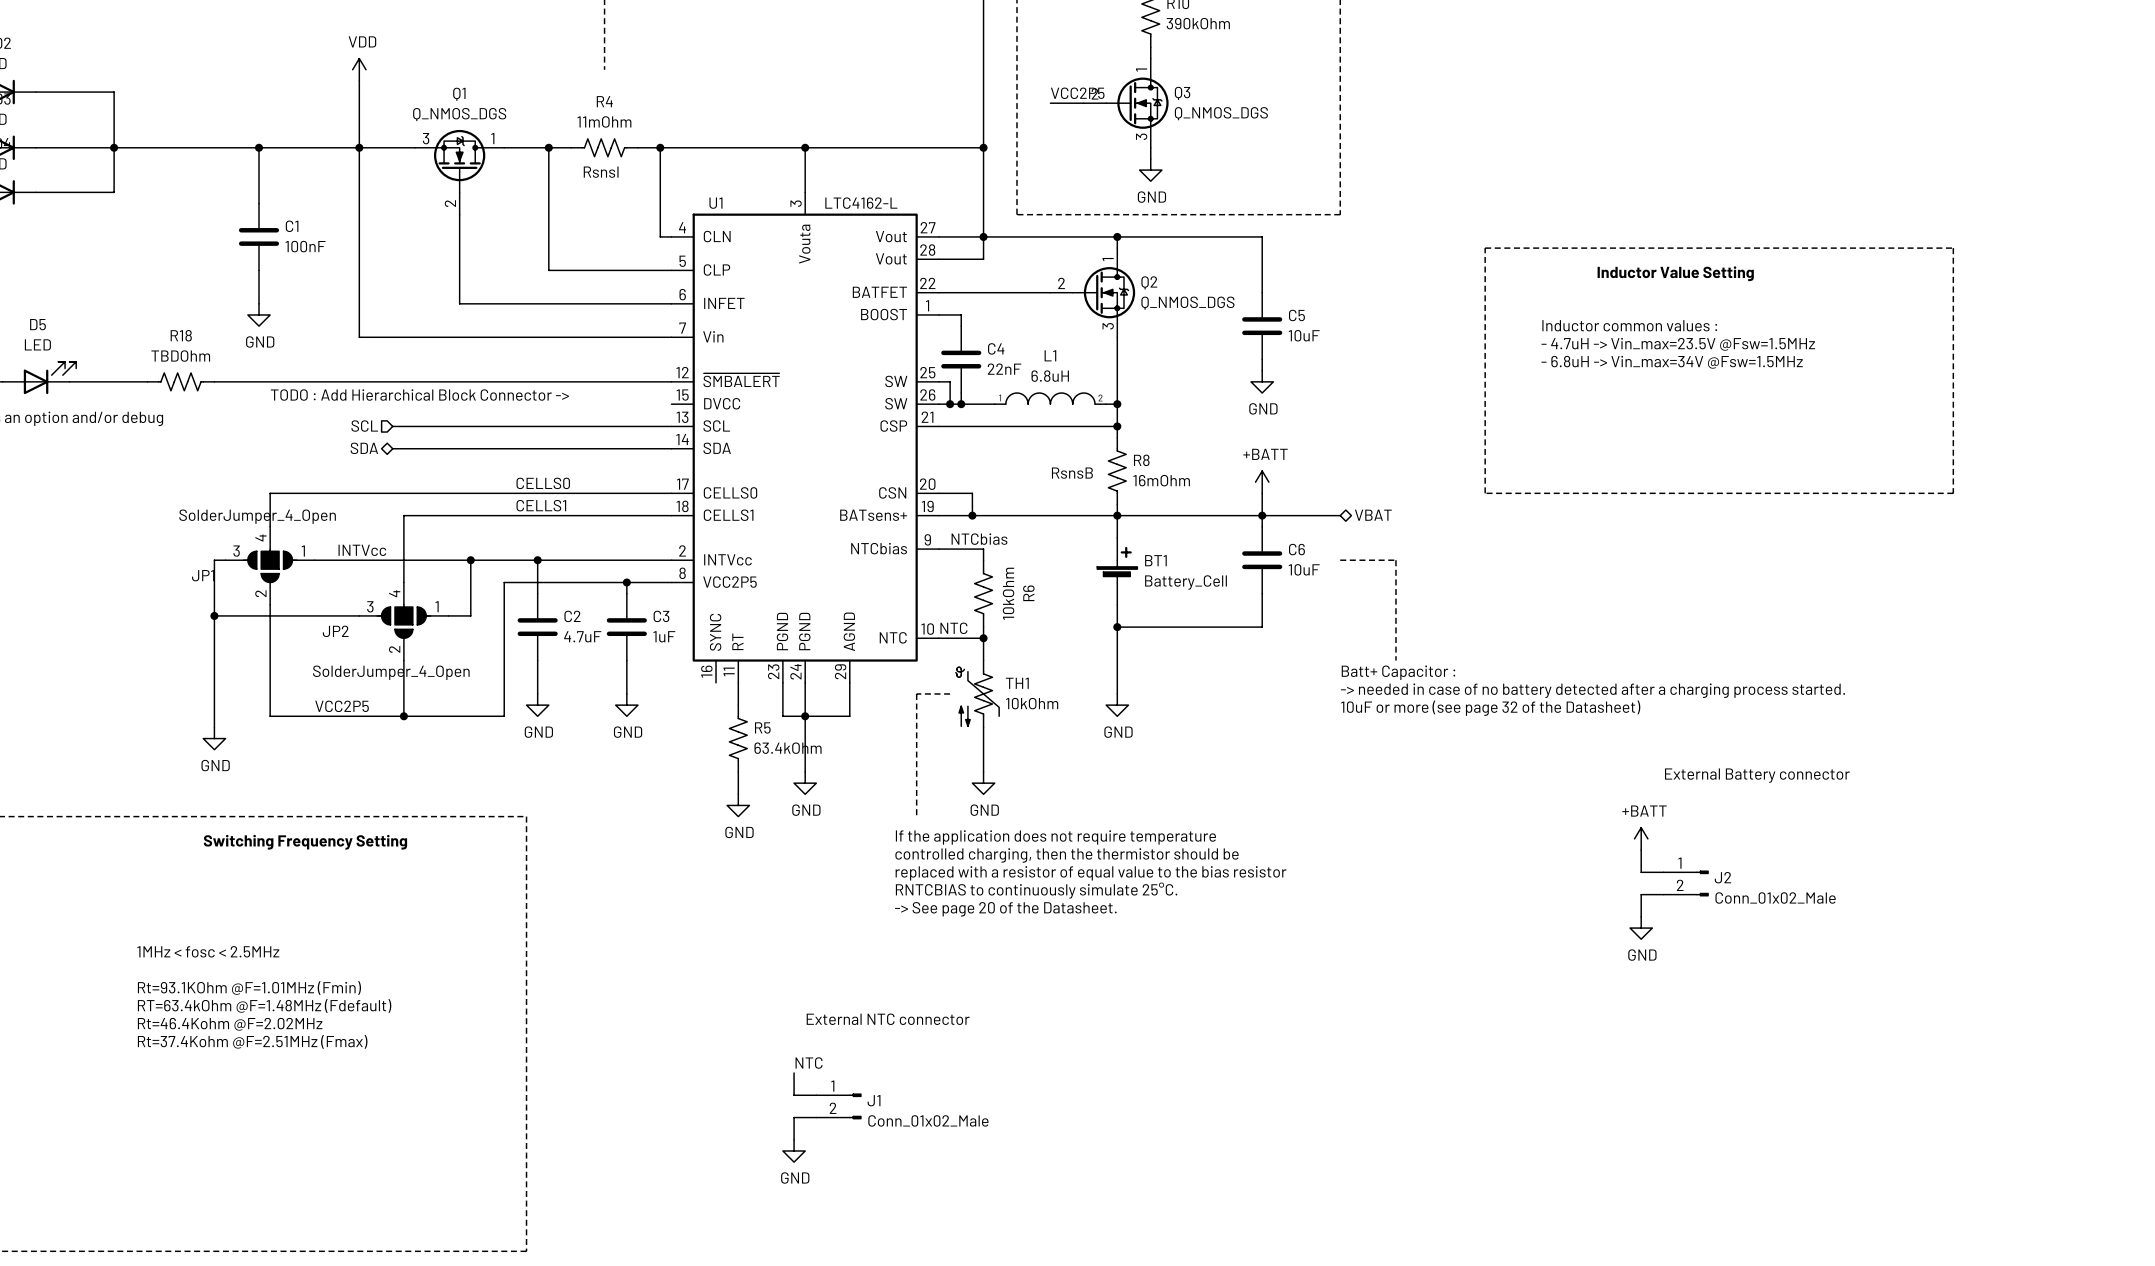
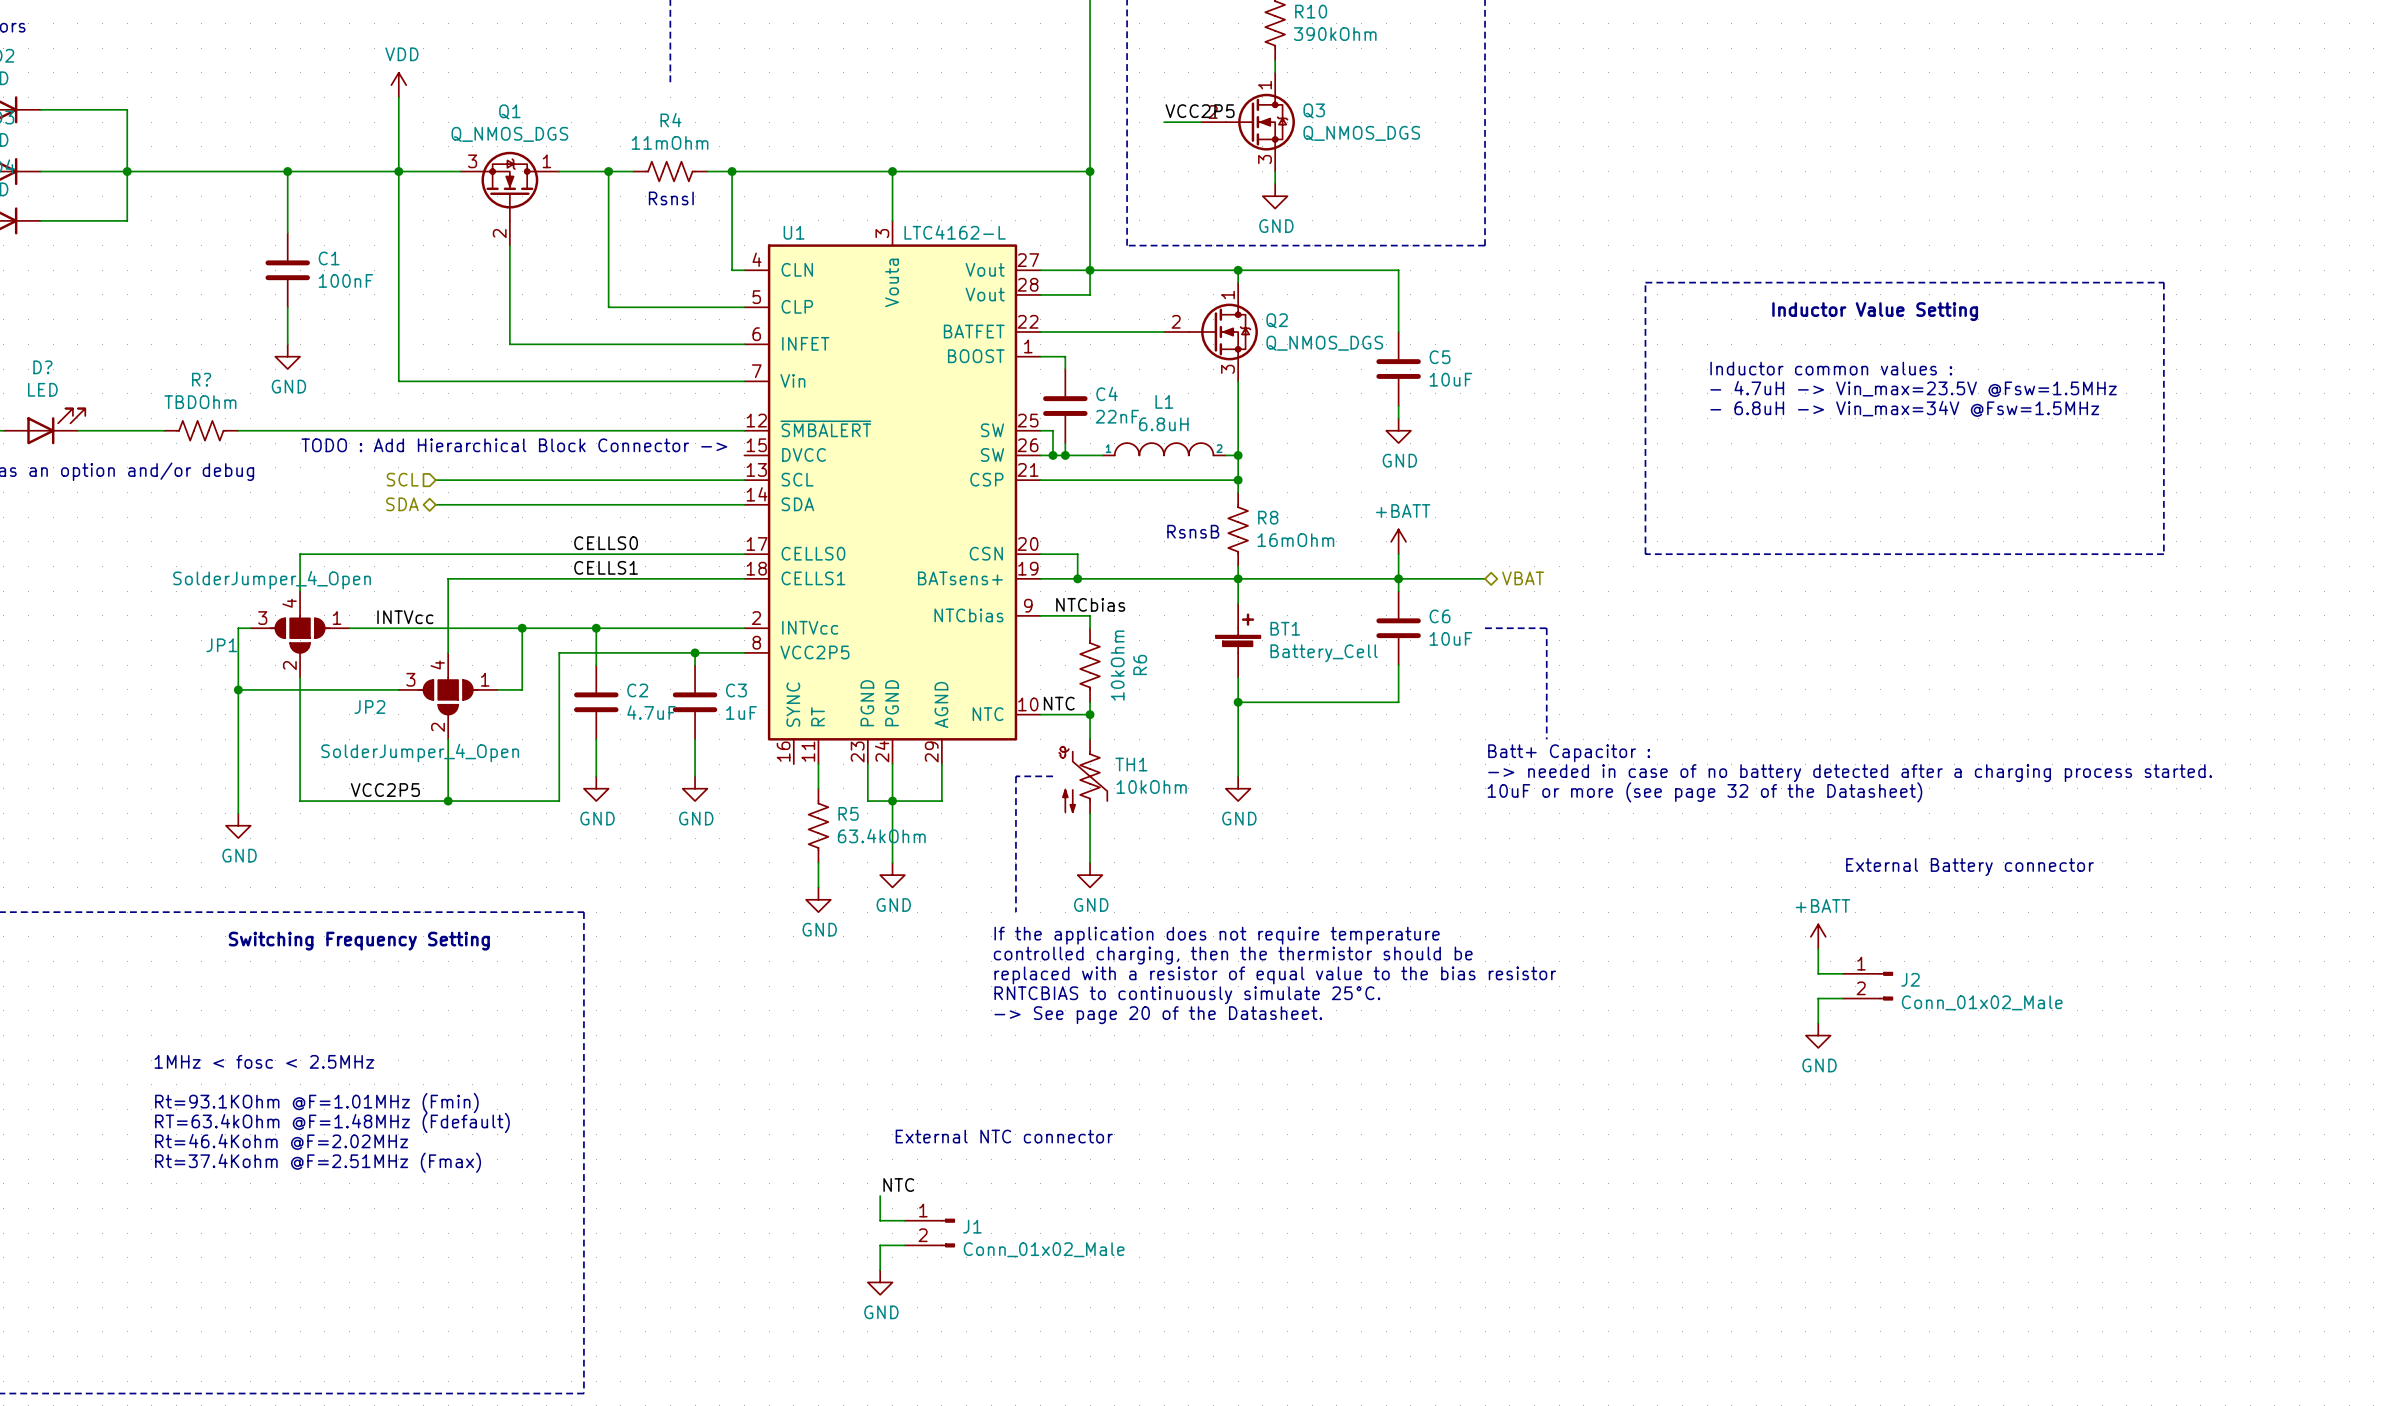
D5 name: D5 (37, 324) -> D? (42, 367)
R18 name: R18 (181, 335) -> R? (201, 379)

